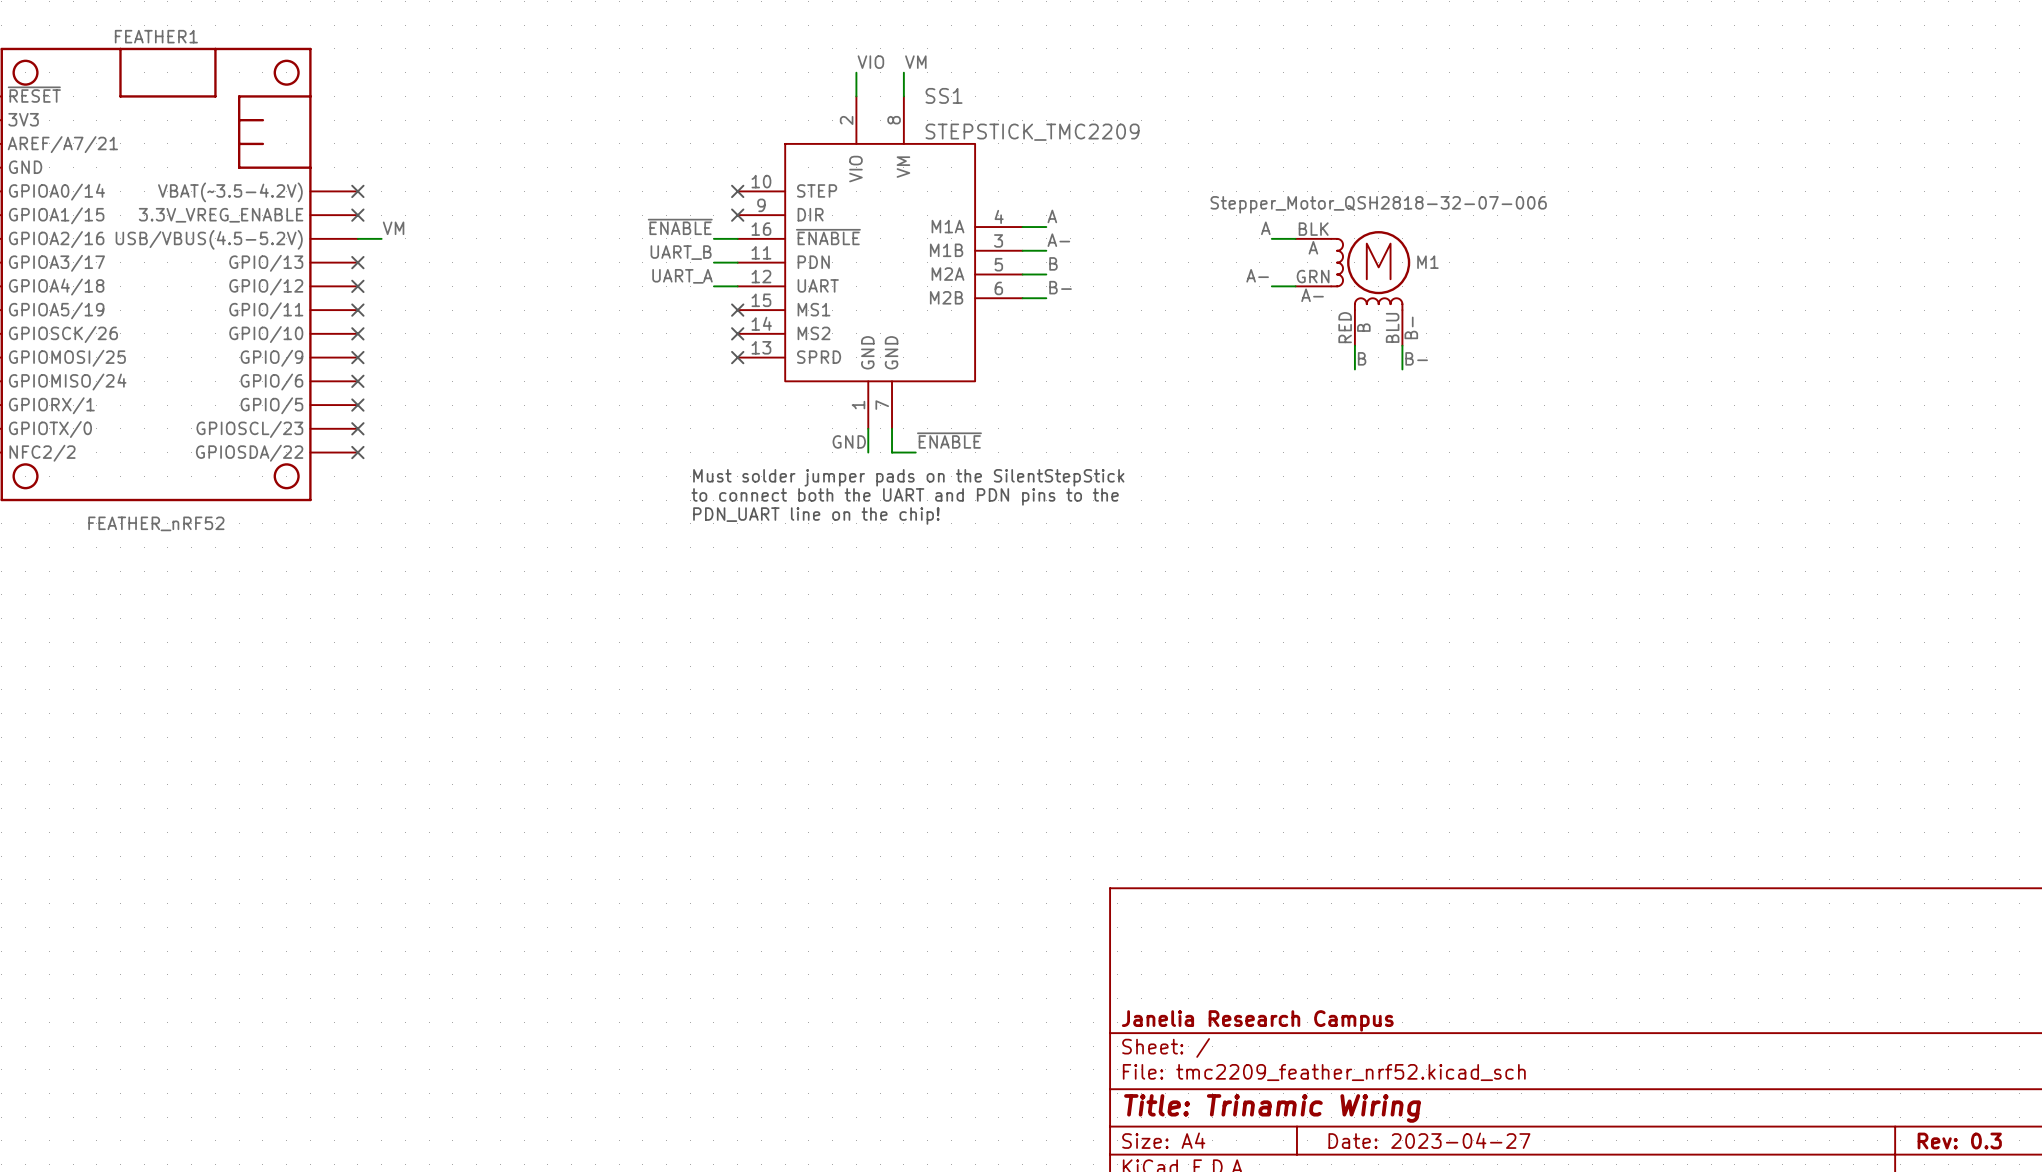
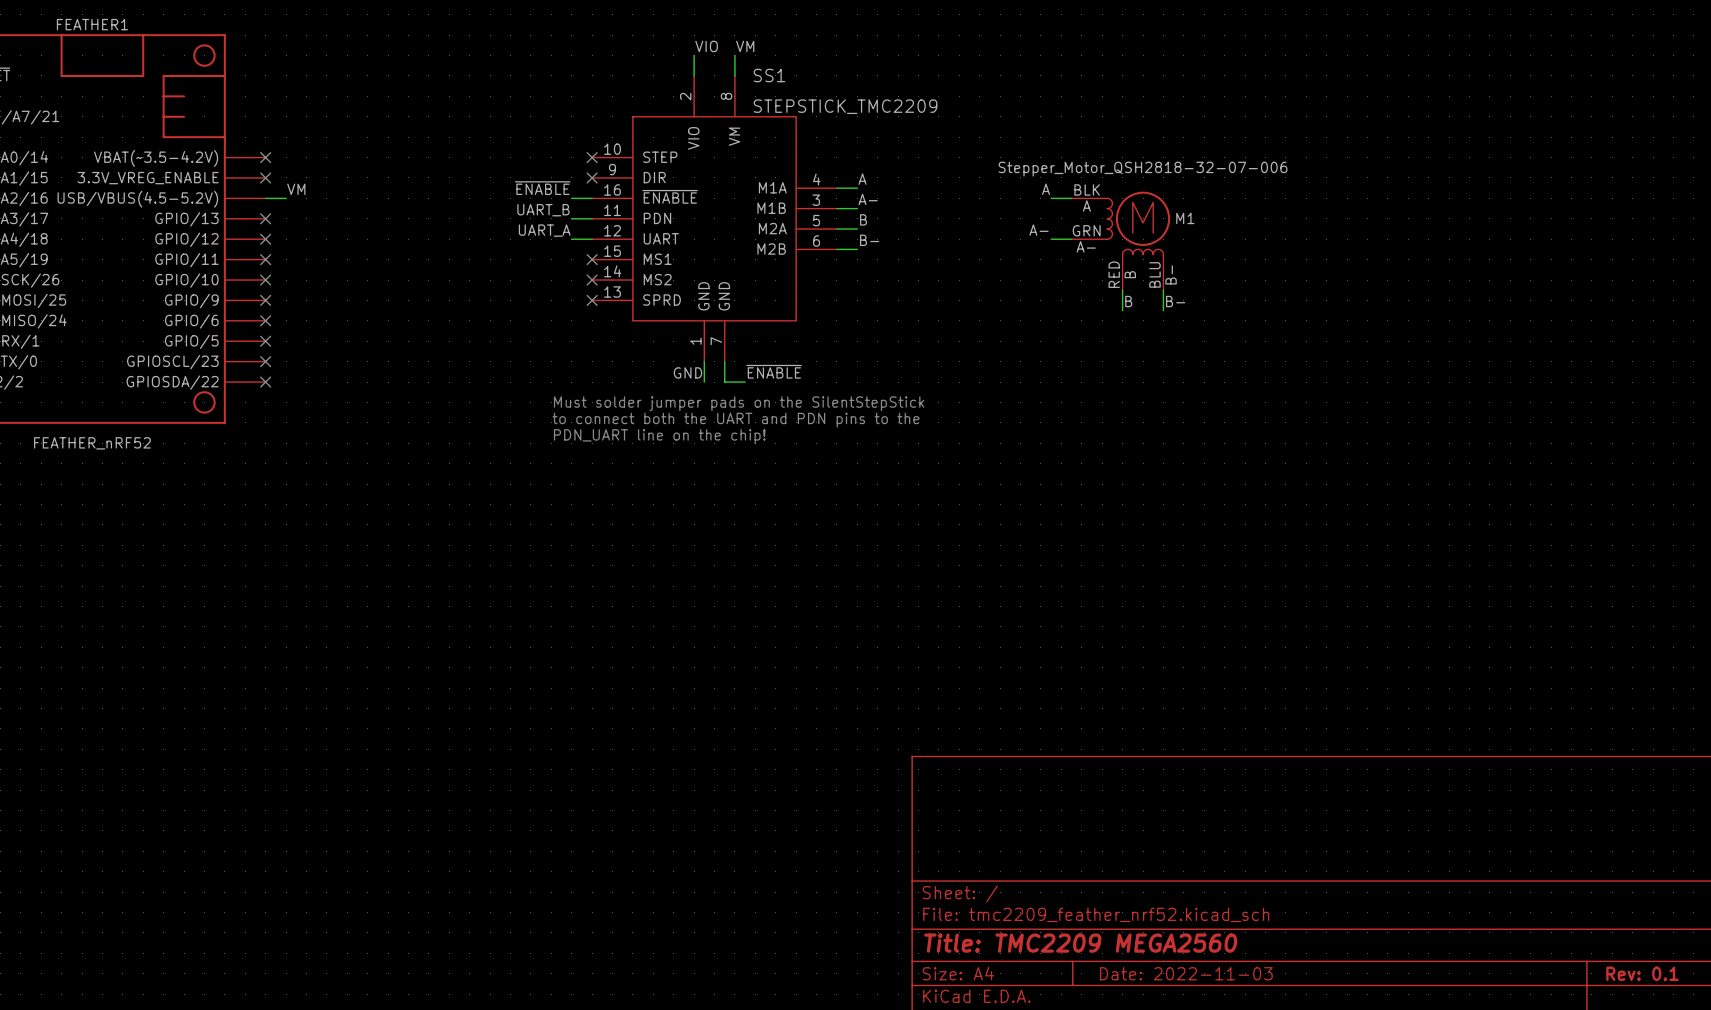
title block: Janelia Research Campus (1257, 1020) -> none
title block: Title: Trinamic Wiring (1272, 1108) -> Title: TMC2209 MEGA2560 (1080, 943)
title block: Date: 2023-04-27 (1429, 1140) -> Date: 2022-11-03 (1186, 973)
title block: Rev: 0.3 (1959, 1141) -> Rev: 0.1 (1642, 973)

